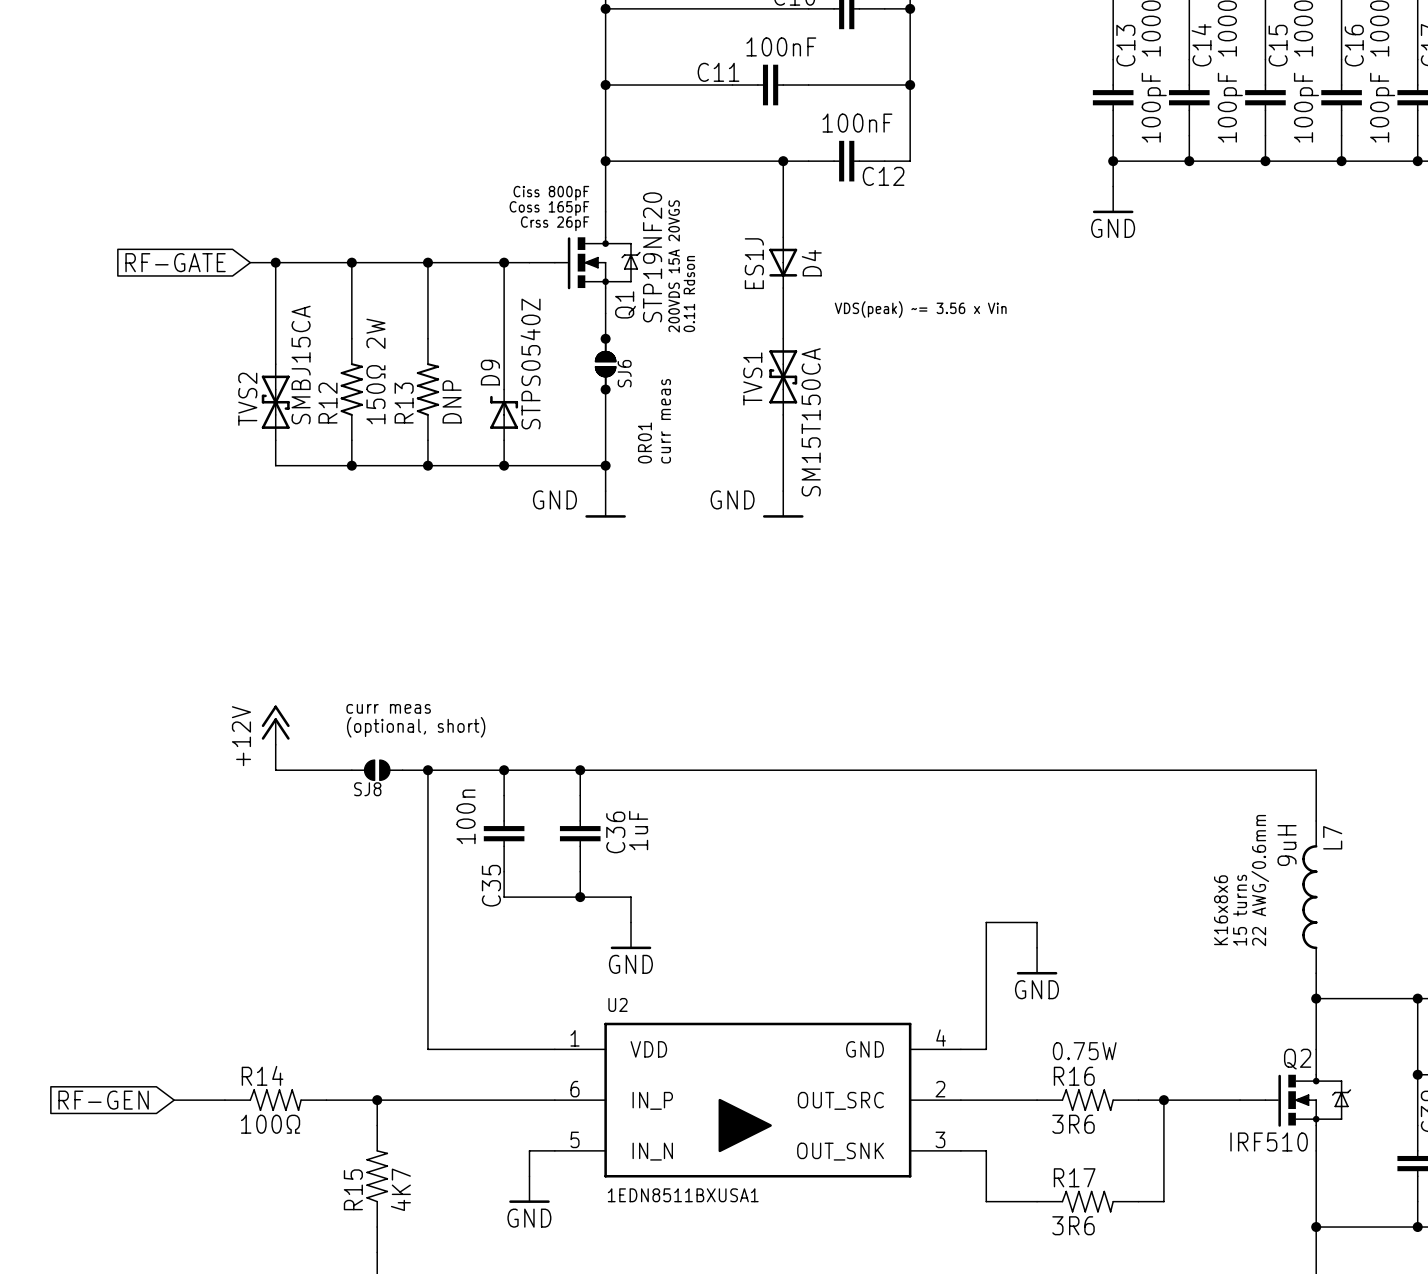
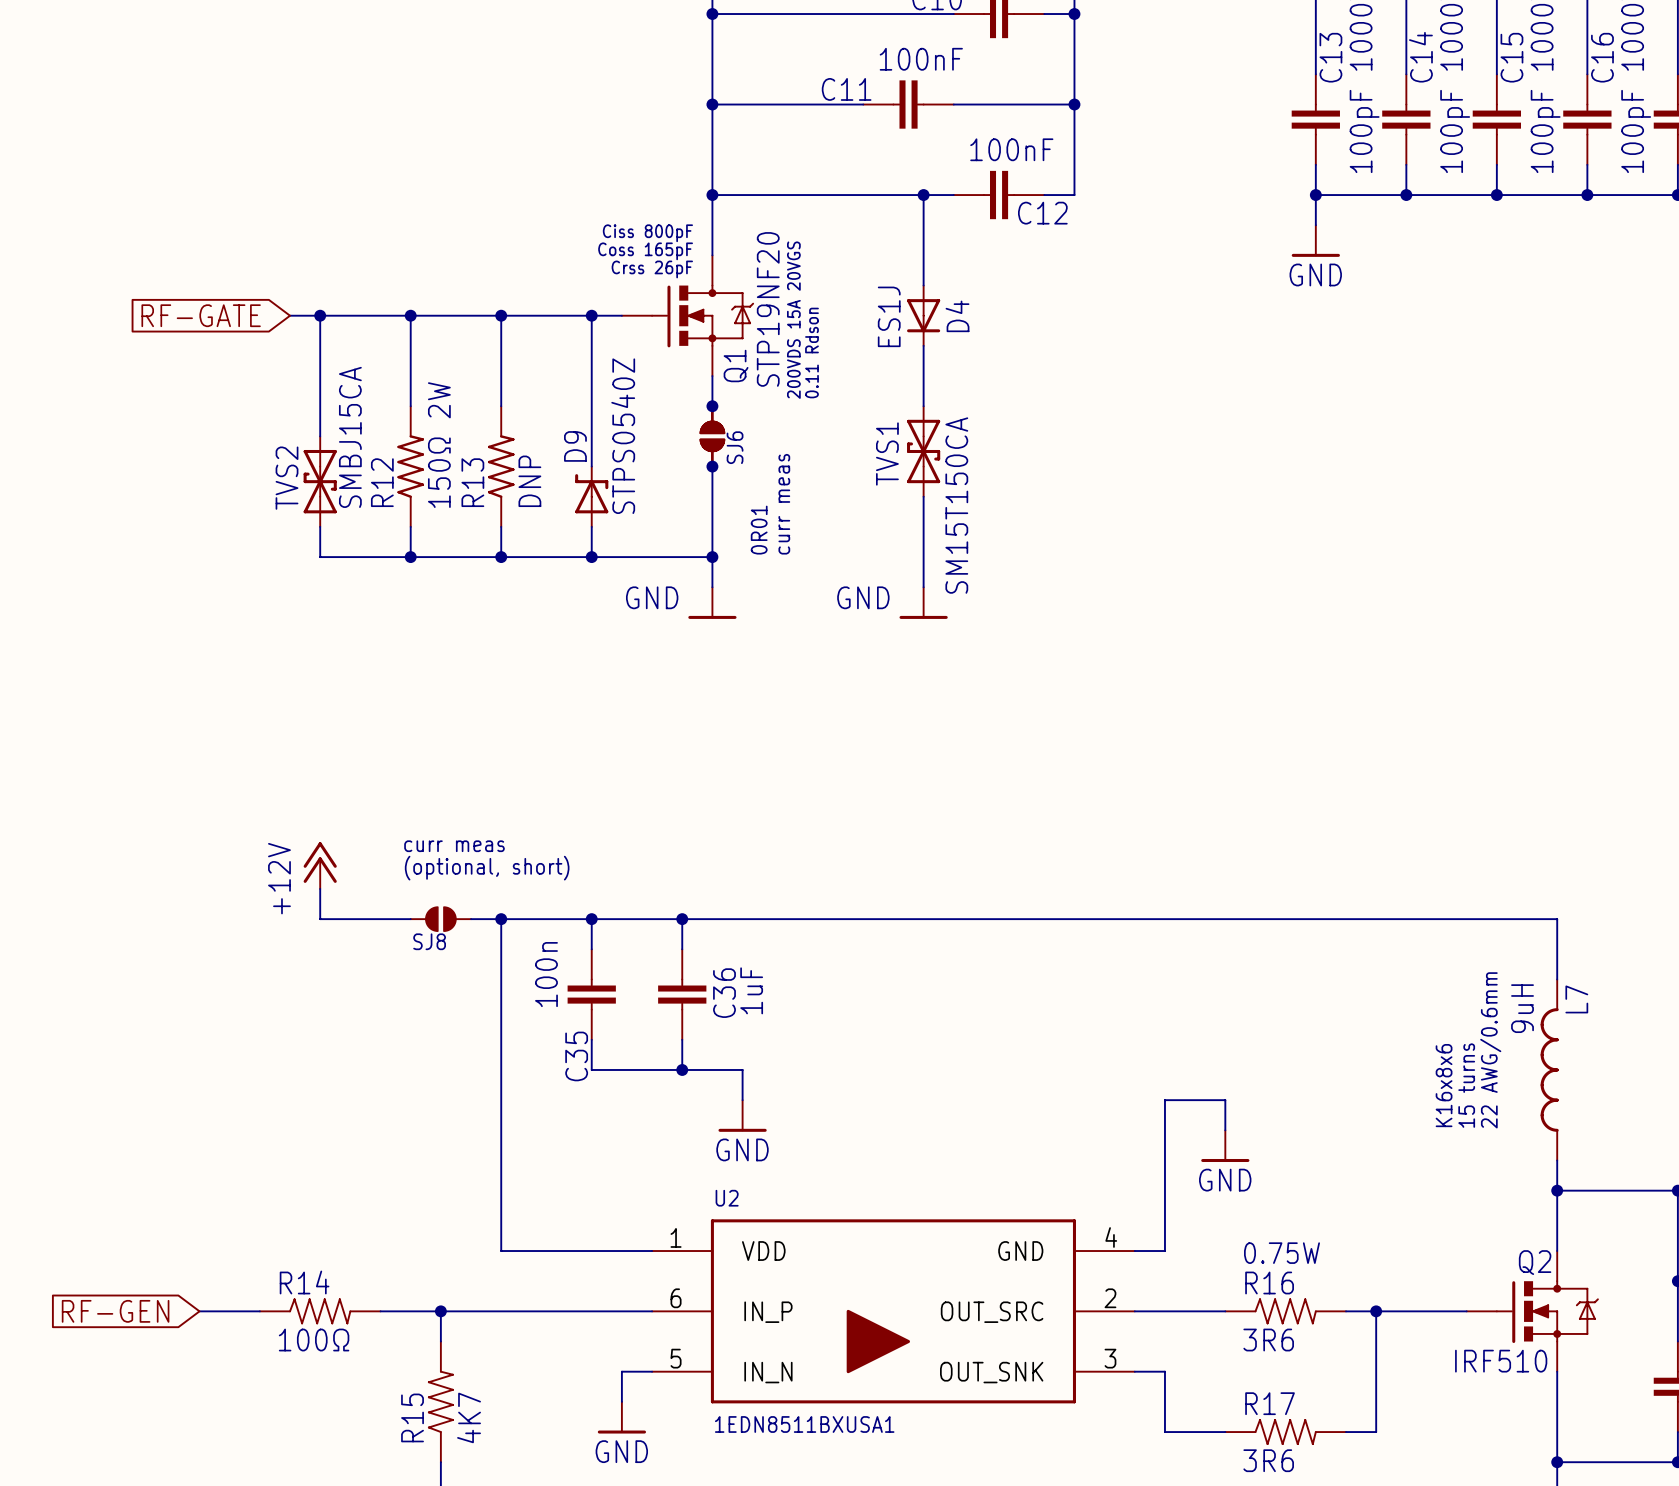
text: VDS(peak) ~= 3.56 x Vin (920, 309) -> none

